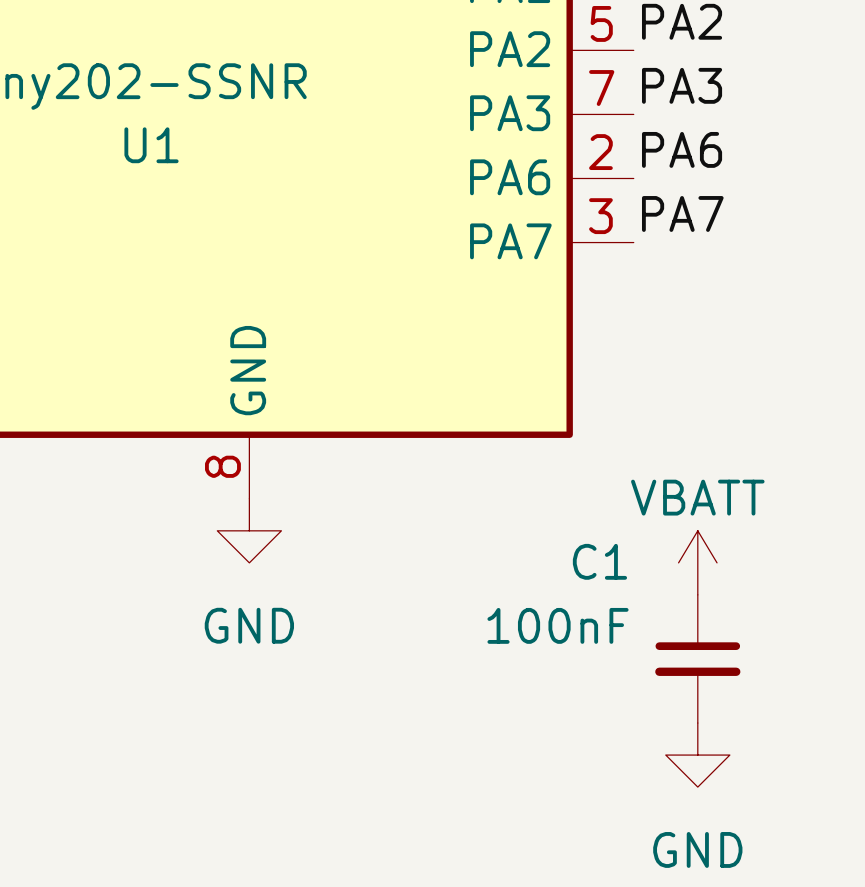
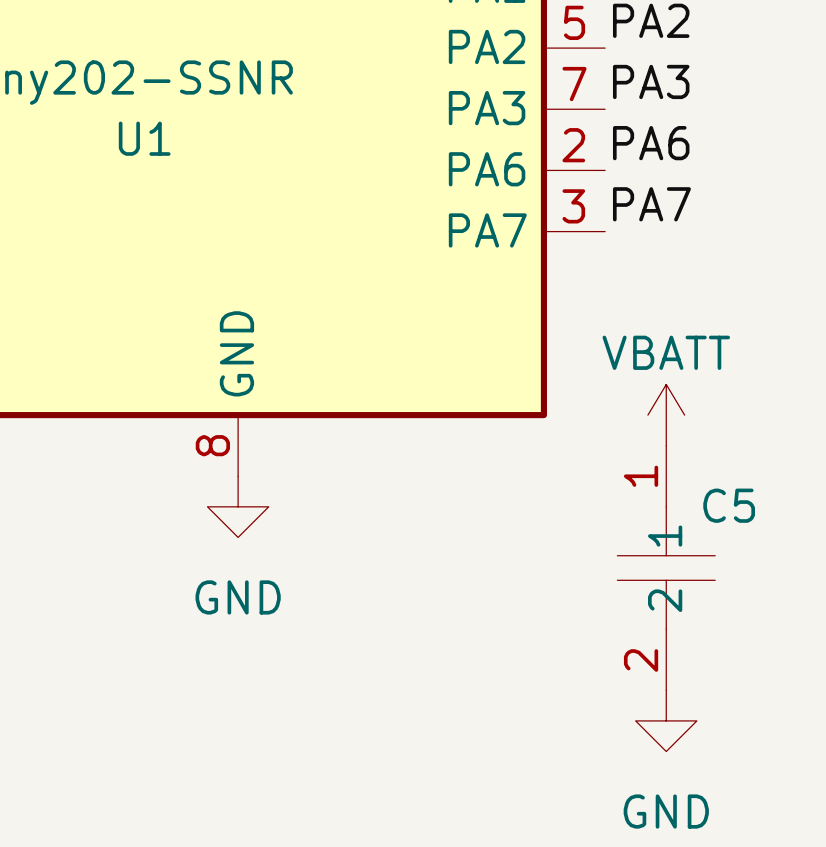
power symbol position: VBATT (697, 562) -> VBATT (666, 415)
C5: none -> (666, 568)
C1: 100nF (697, 658) -> none

